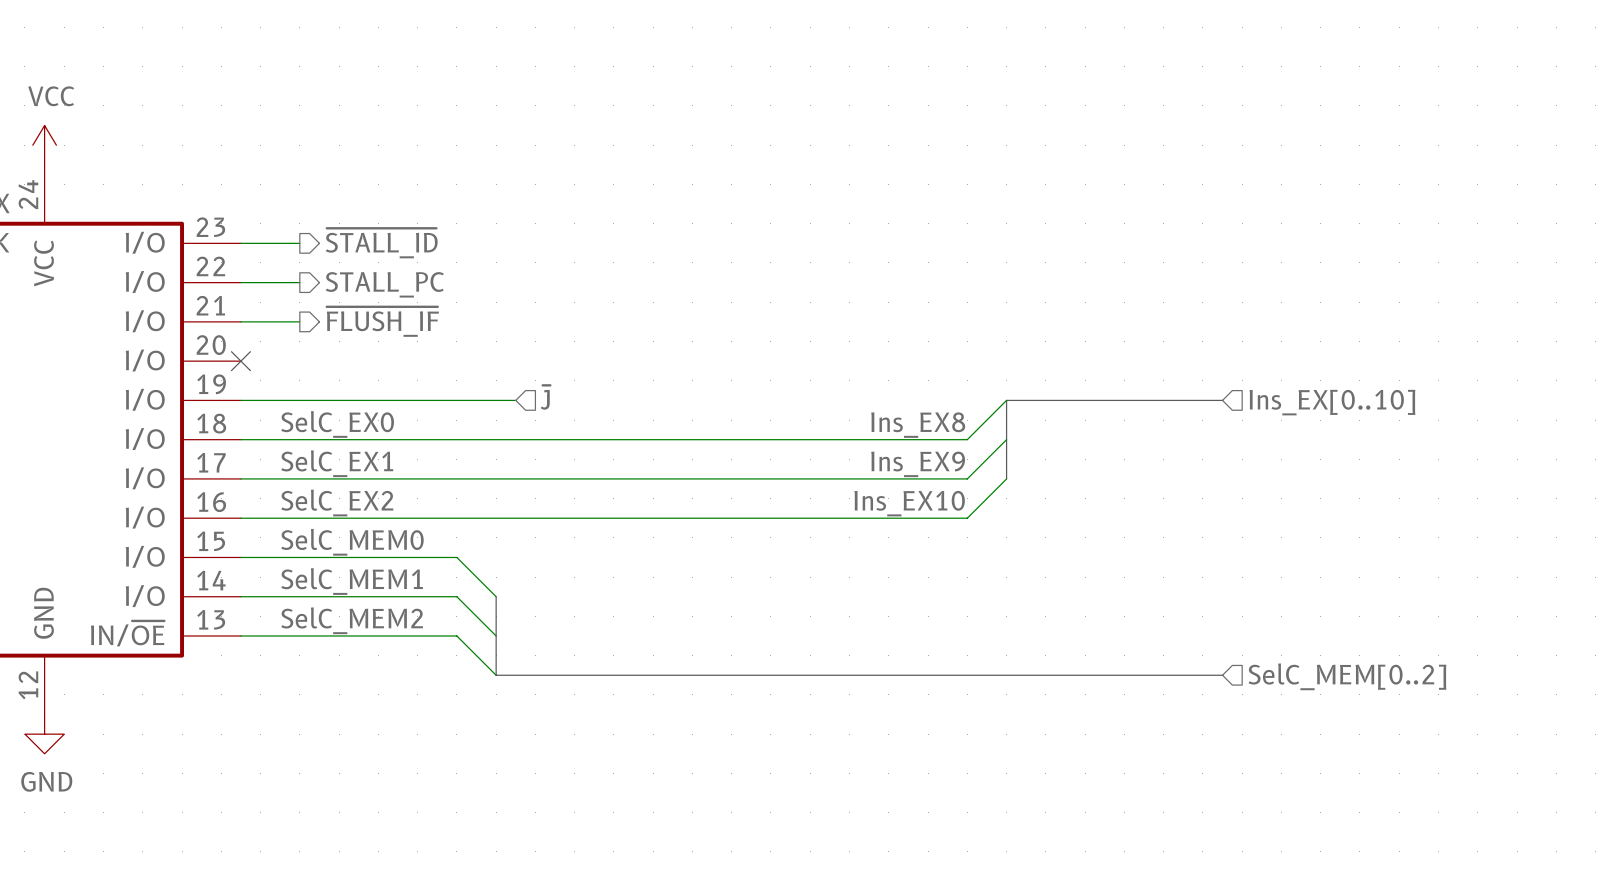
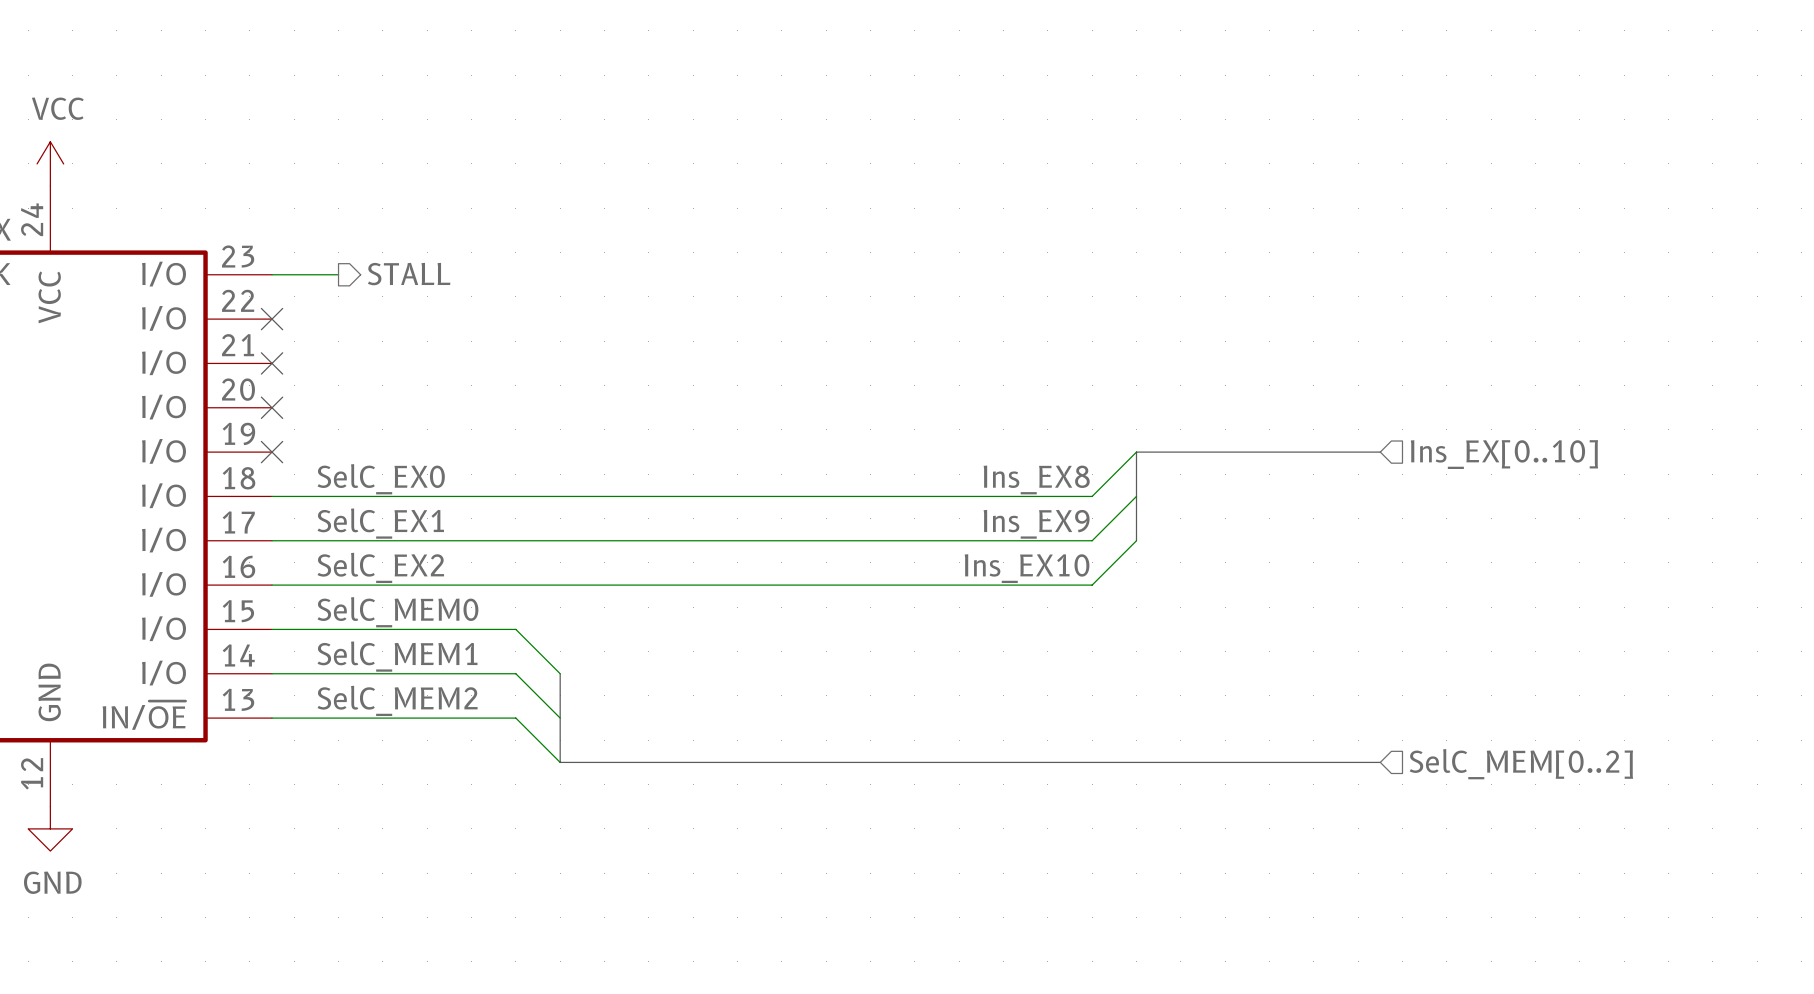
hierarchical label: ~{STALL_ID} (381, 243) -> STALL (409, 274)
wire: (240, 282) (299, 282) -> none
no-connect mark: none -> (272, 319)
hierarchical label: STALL_PC (384, 284) -> none
wire: (240, 321) (299, 321) -> none
no-connect mark: none -> (272, 363)
hierarchical label: ~{FLUSH_IF} (382, 321) -> none
hierarchical label: ~{J} (545, 397) -> none
wire: (240, 400) (515, 400) -> none
no-connect mark: none -> (272, 452)

